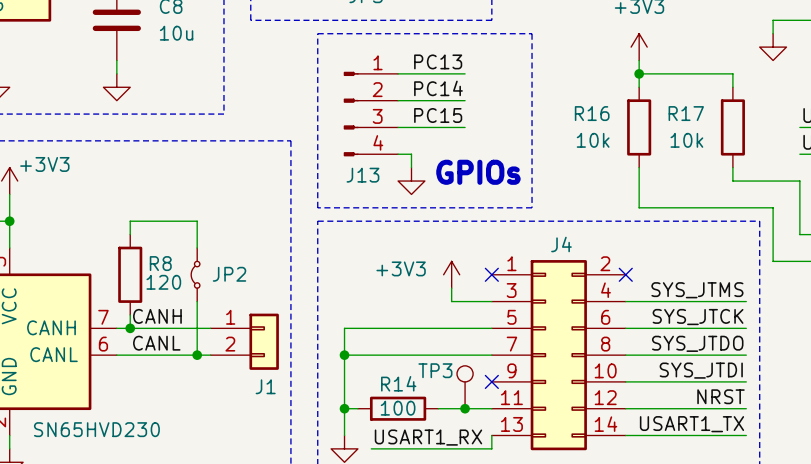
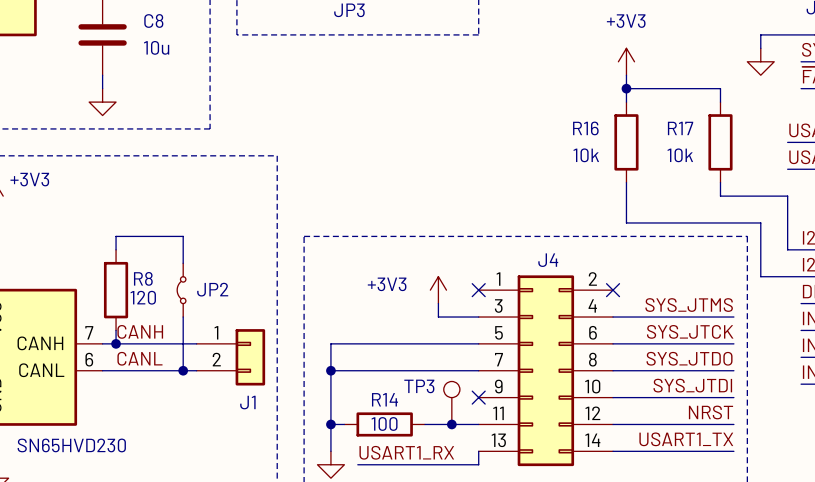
line: (317, 33) (532, 33) (532, 207) (317, 207) (317, 33) -> none
label: PC13 (438, 61) -> none
wire: (398, 73) (465, 73) -> none
label: PC14 (438, 88) -> none
wire: (398, 100) (465, 100) -> none
J13: (370, 114) -> none
label: PC15 (438, 115) -> none
wire: (398, 127) (465, 127) -> none
wire: (398, 154) (411, 154) (411, 167) -> none
text: GPIOs (478, 172) -> none
power symbol: (411, 181) -> none

